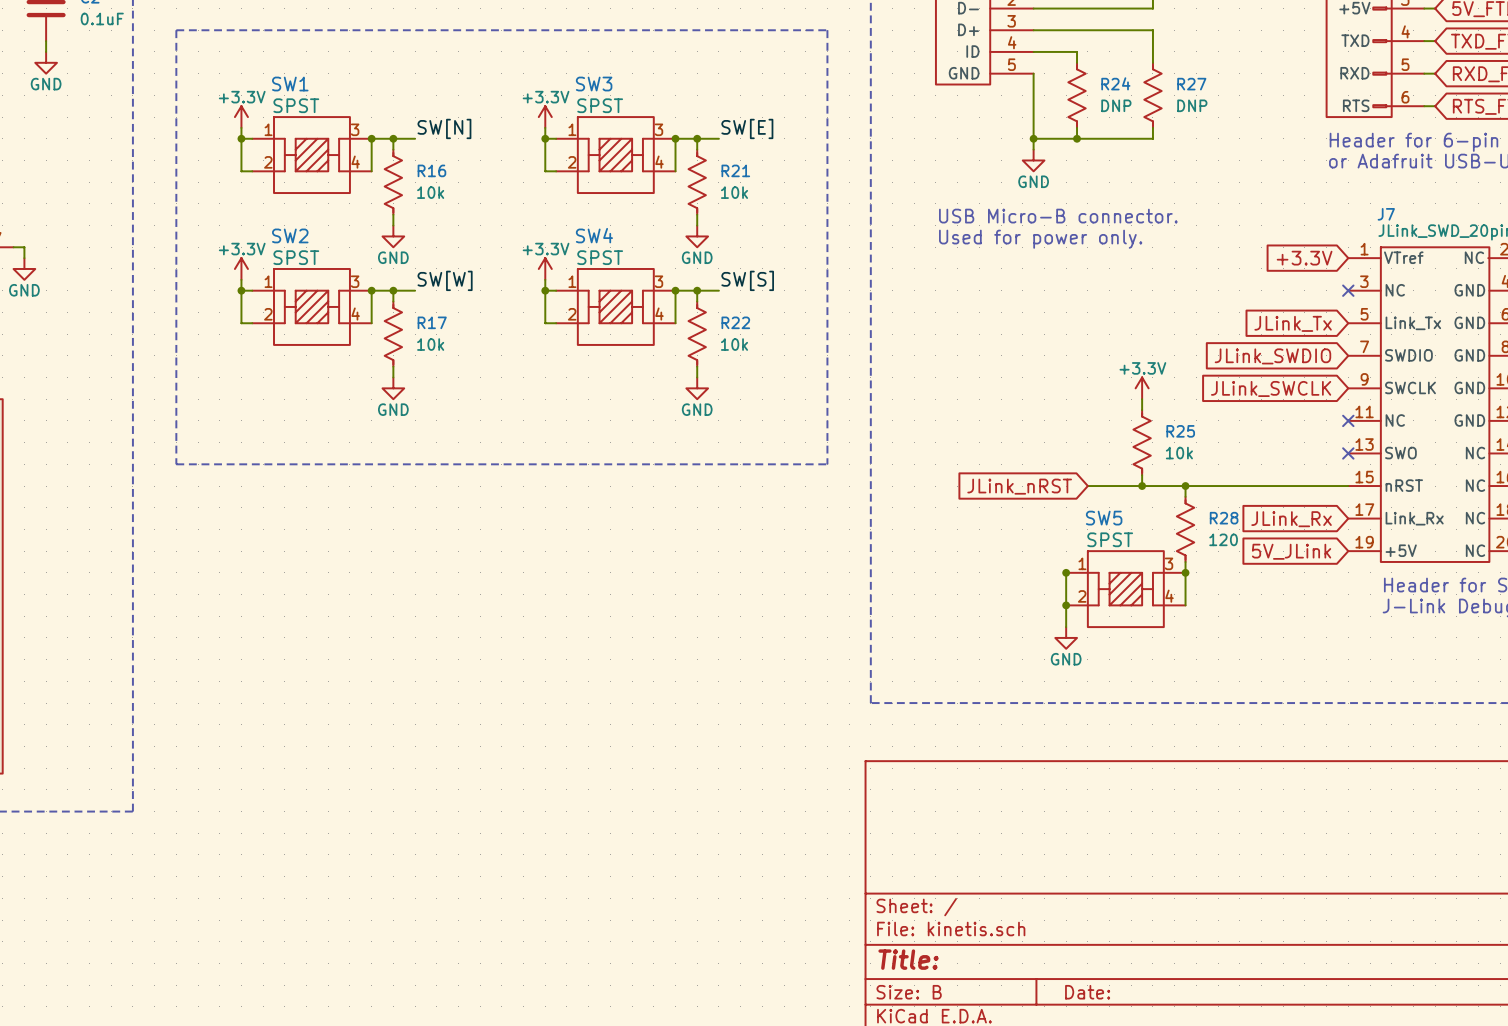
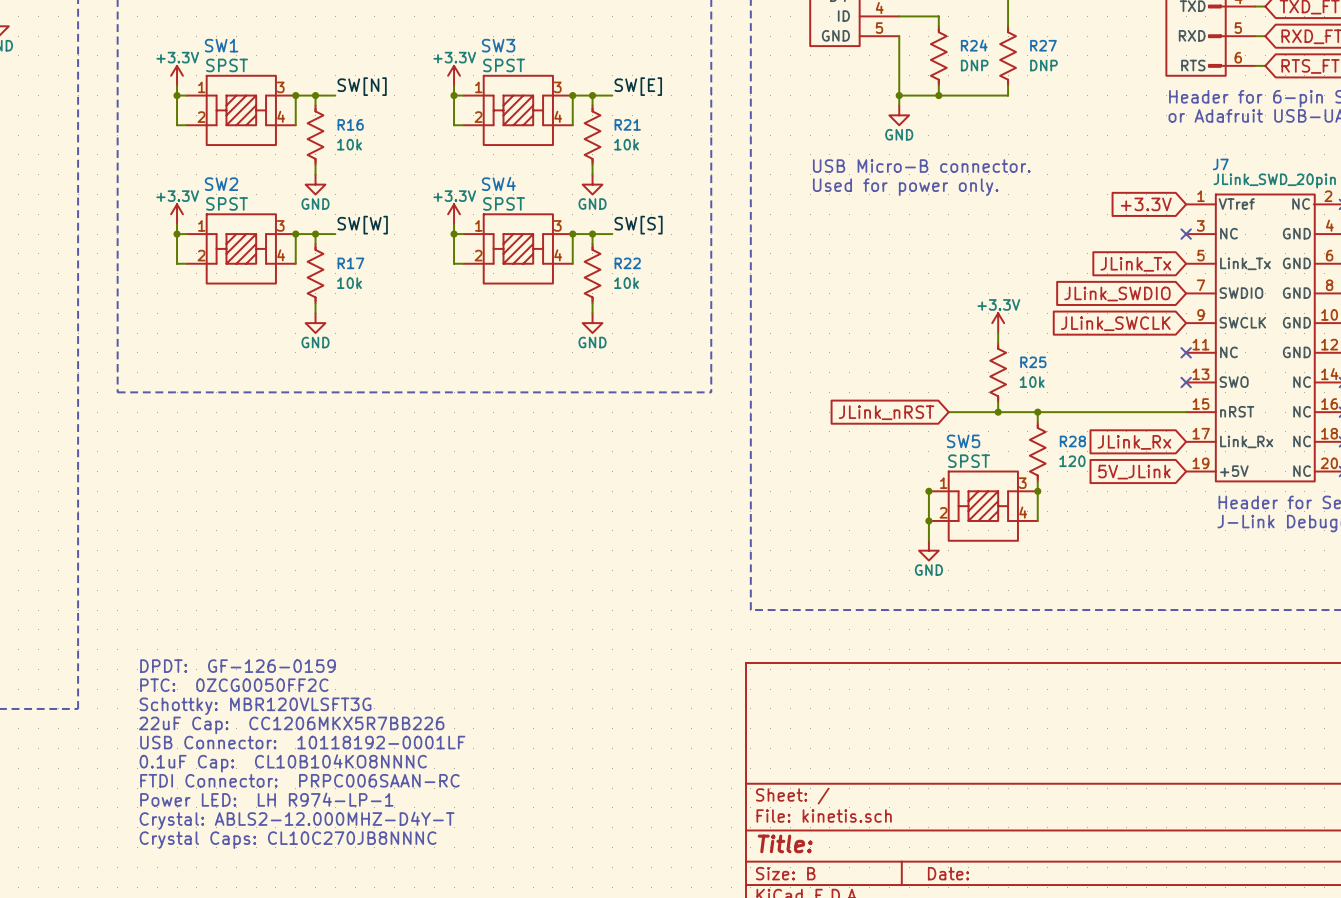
text: none -> DPDT: GF-126-0159 (238, 666)
text: none -> PTC: 0ZCG0050FF2C (234, 685)
text: none -> Schottky: MBR120VLSFT3G (255, 706)
text: none -> 22uF Cap: CC1206MKX5R7BB226 (291, 725)
text: none -> USB Connector: 10118192-0001LF (302, 742)
text: none -> 0.1uF Cap: CL10B104KO8NNNC (283, 763)
text: none -> FTDI Connector: PRPC006SAAN-RC (299, 780)
text: none -> Power LED: LH R974-LP-1 (266, 799)
text: none -> Crystal: ABLS2-12.000MHZ-D4Y-T (297, 820)
text: none -> Crystal Caps: CL10C270JB8NNNC (288, 840)

